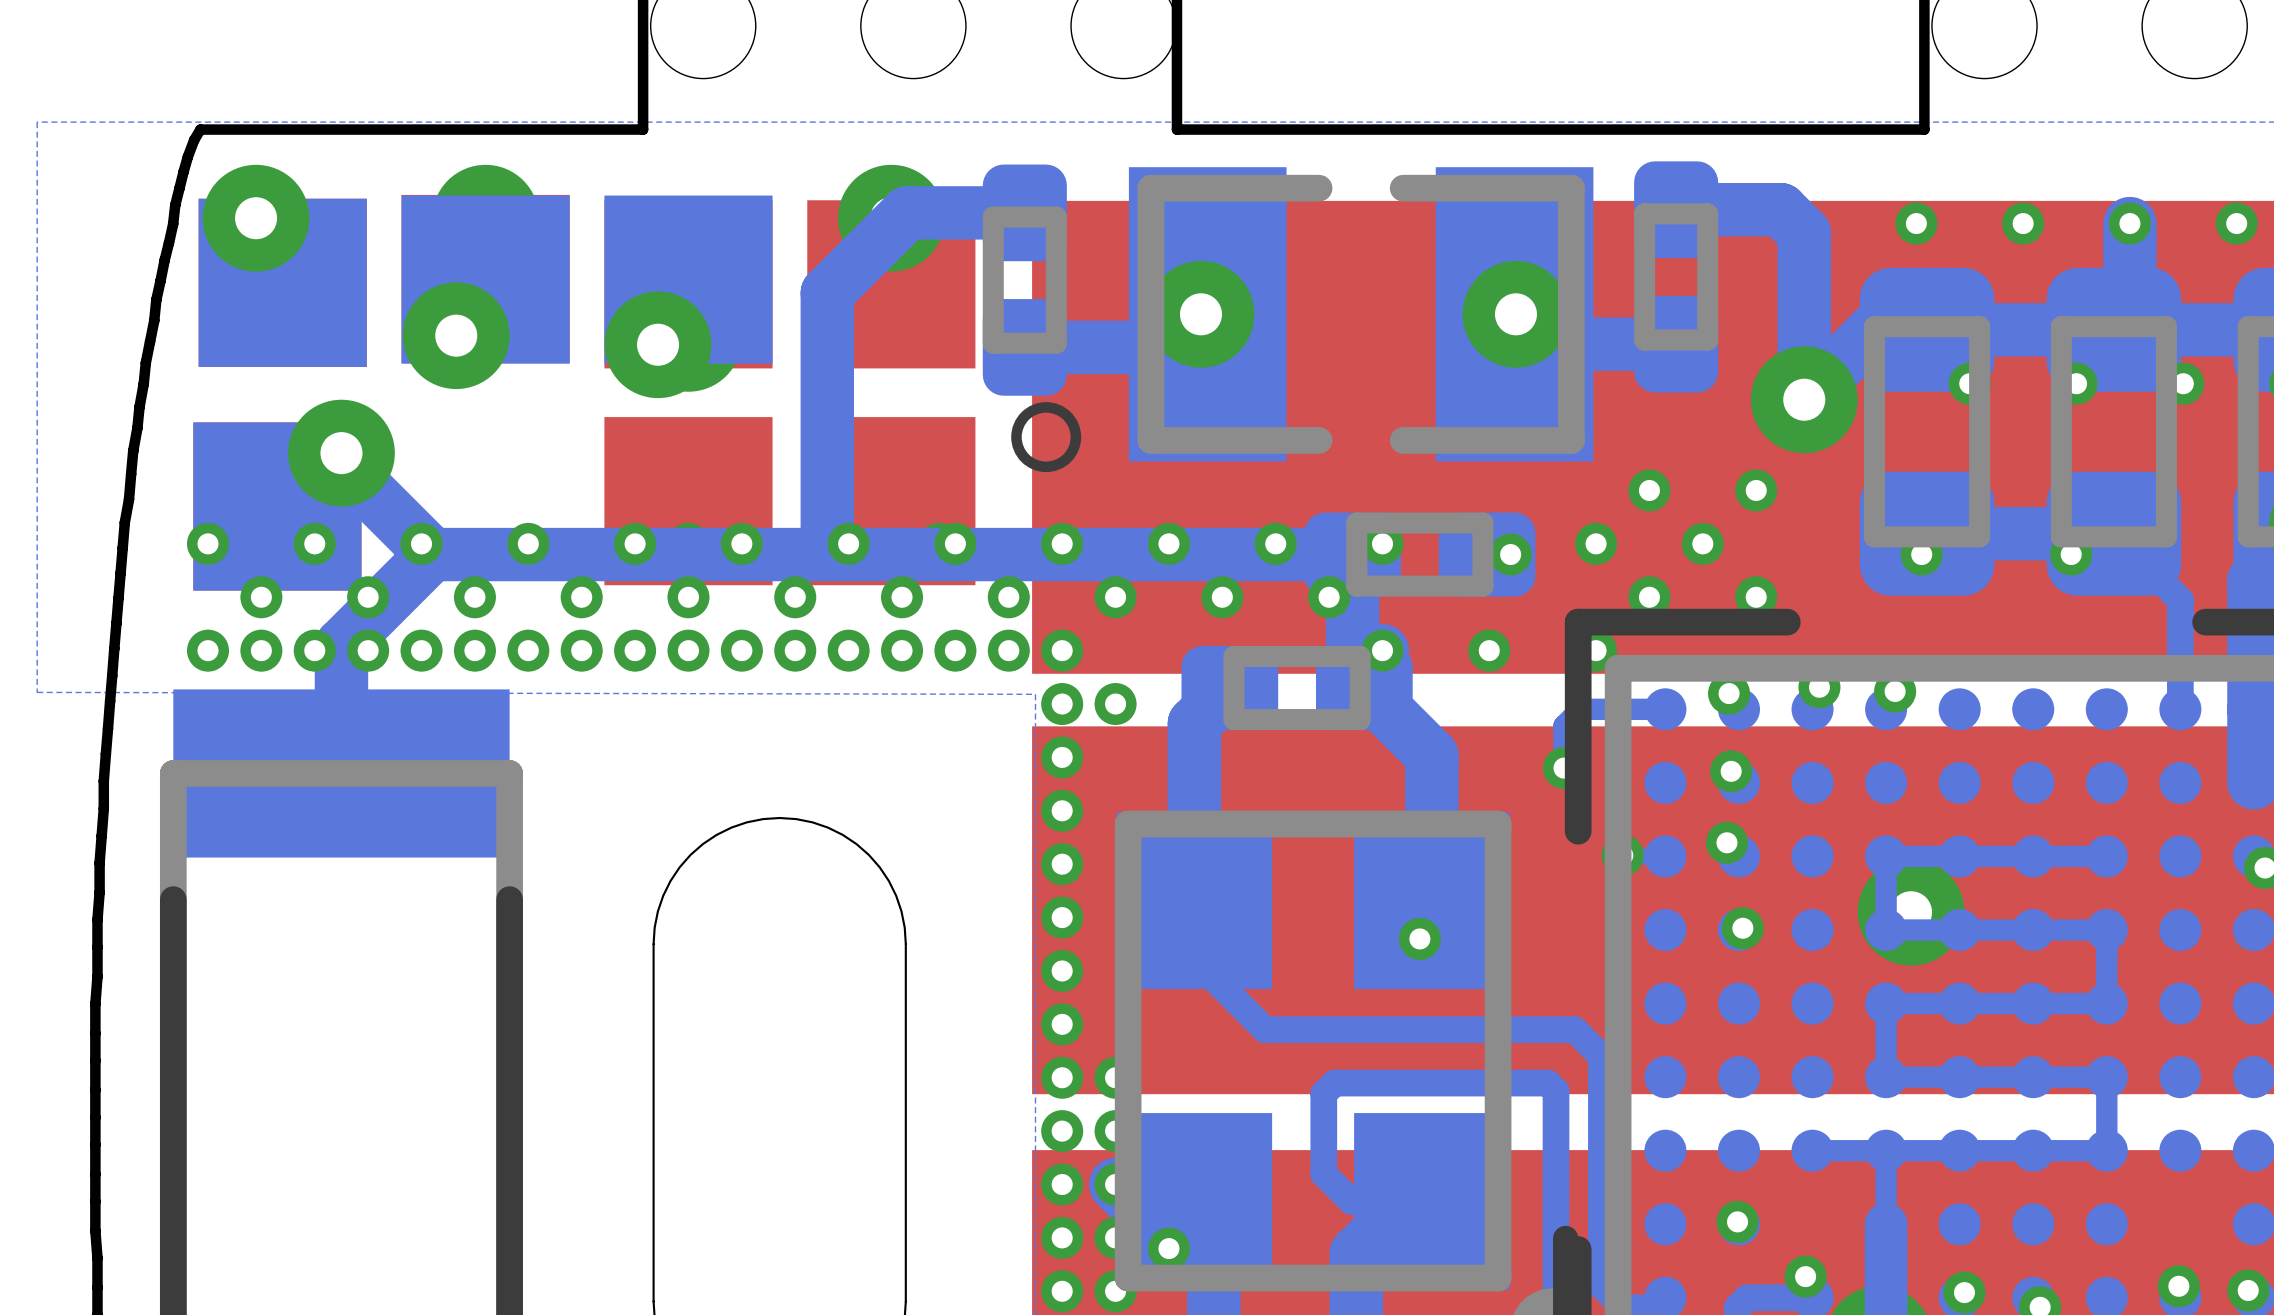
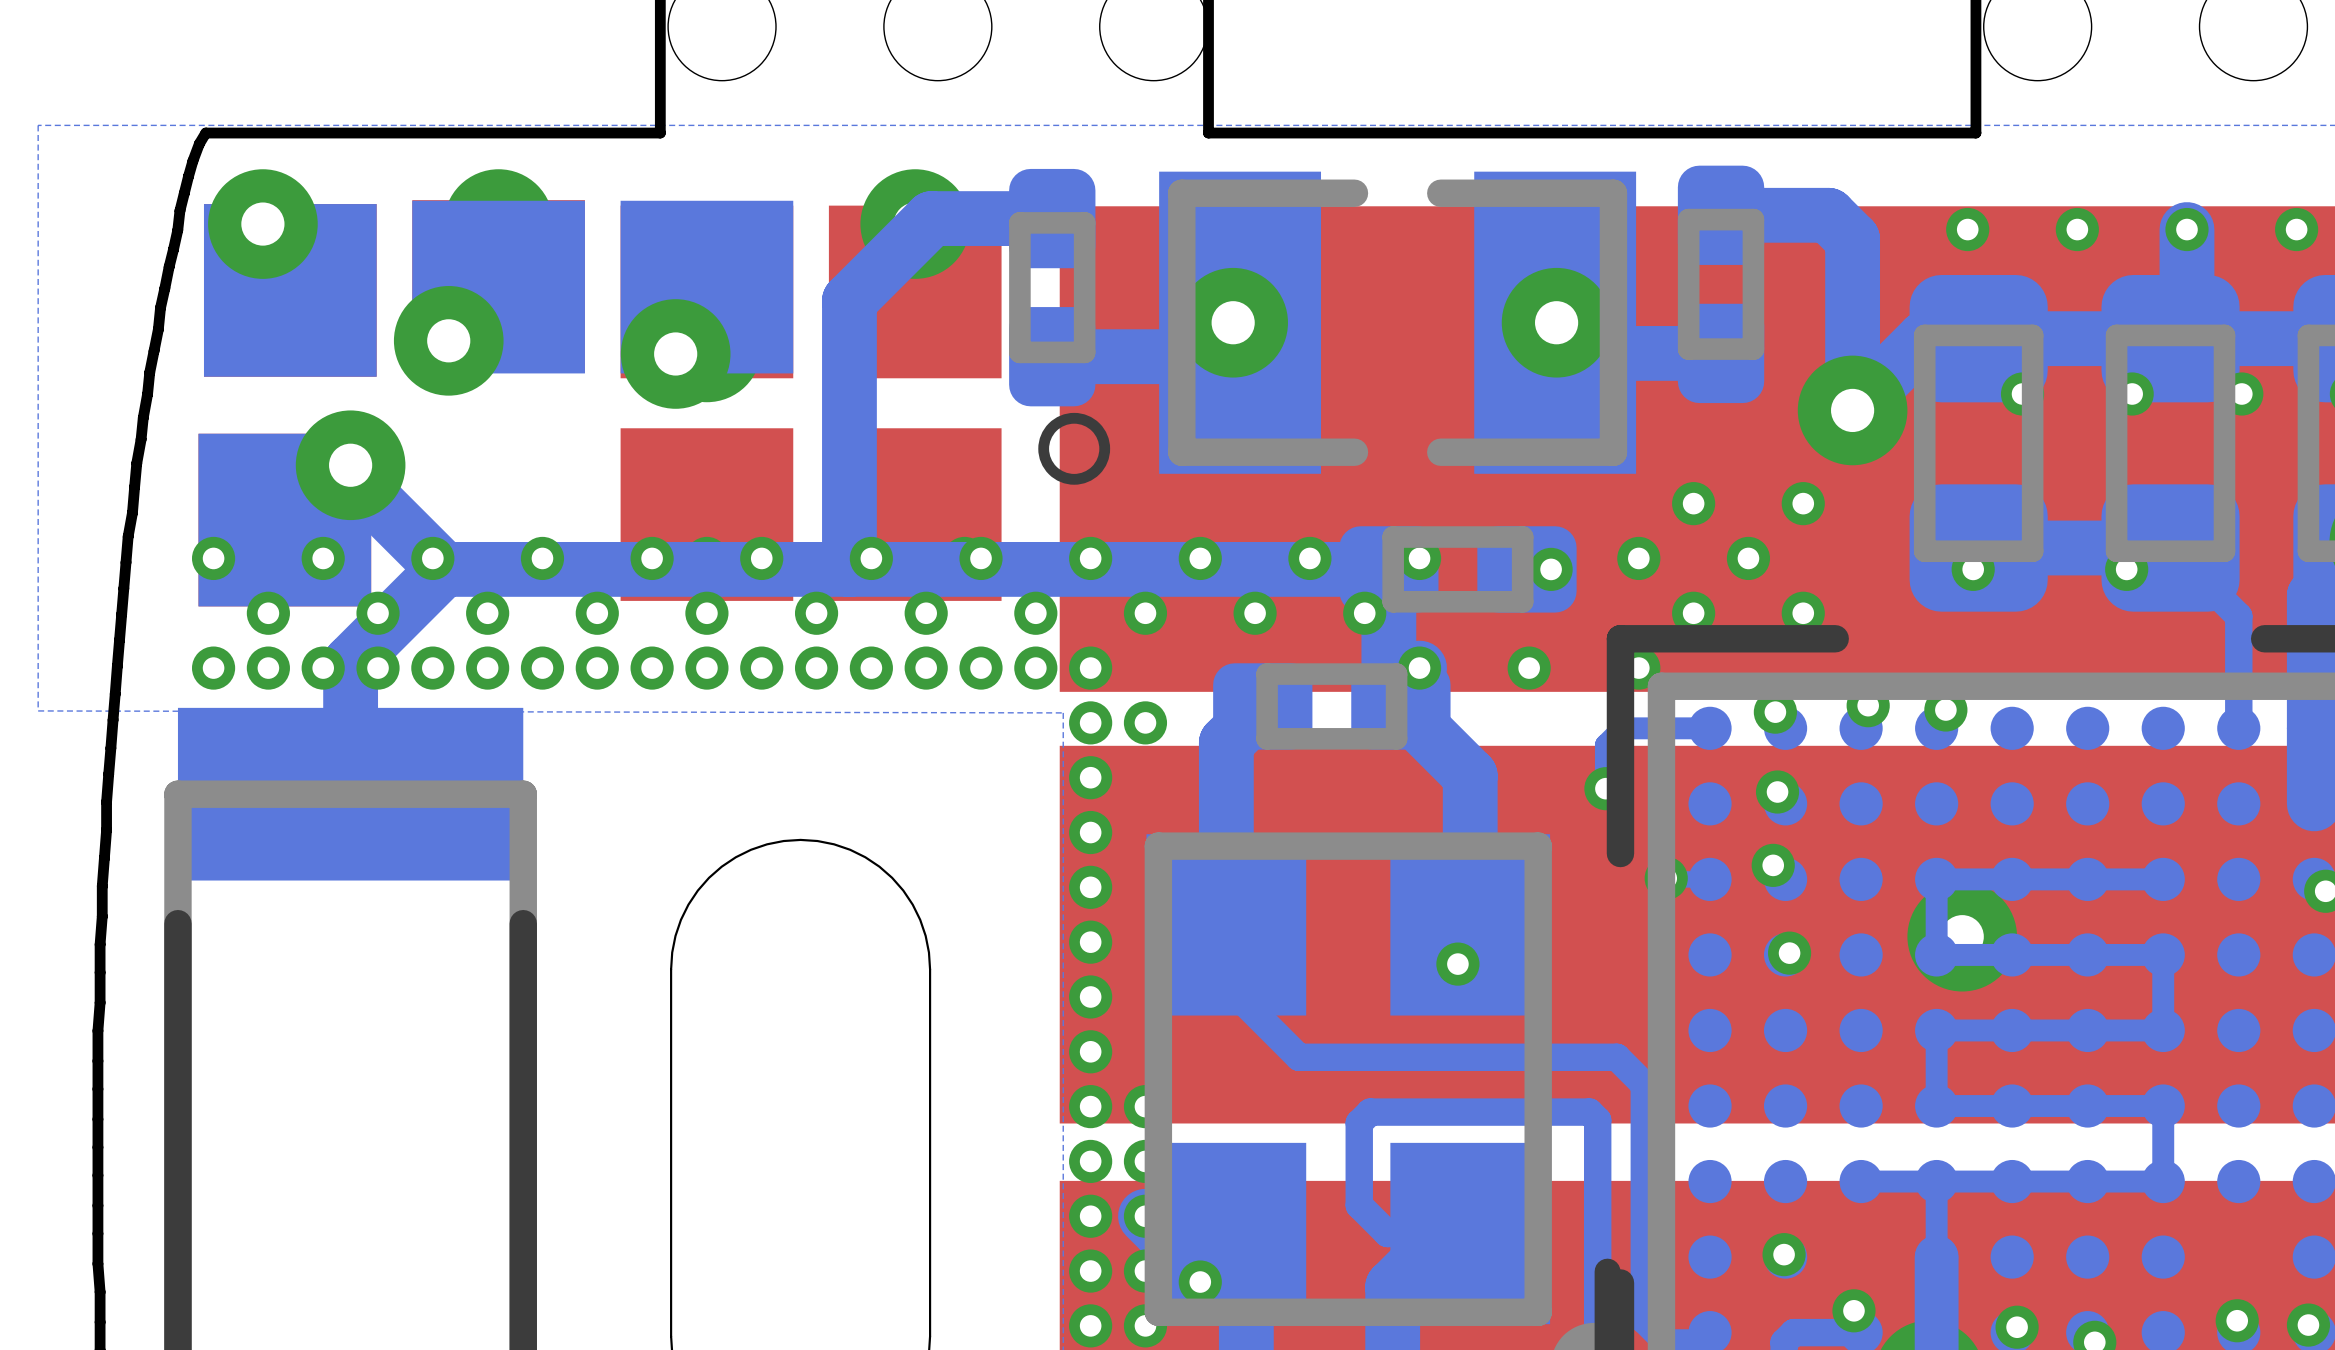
via position: (456, 335) -> (448, 340)

